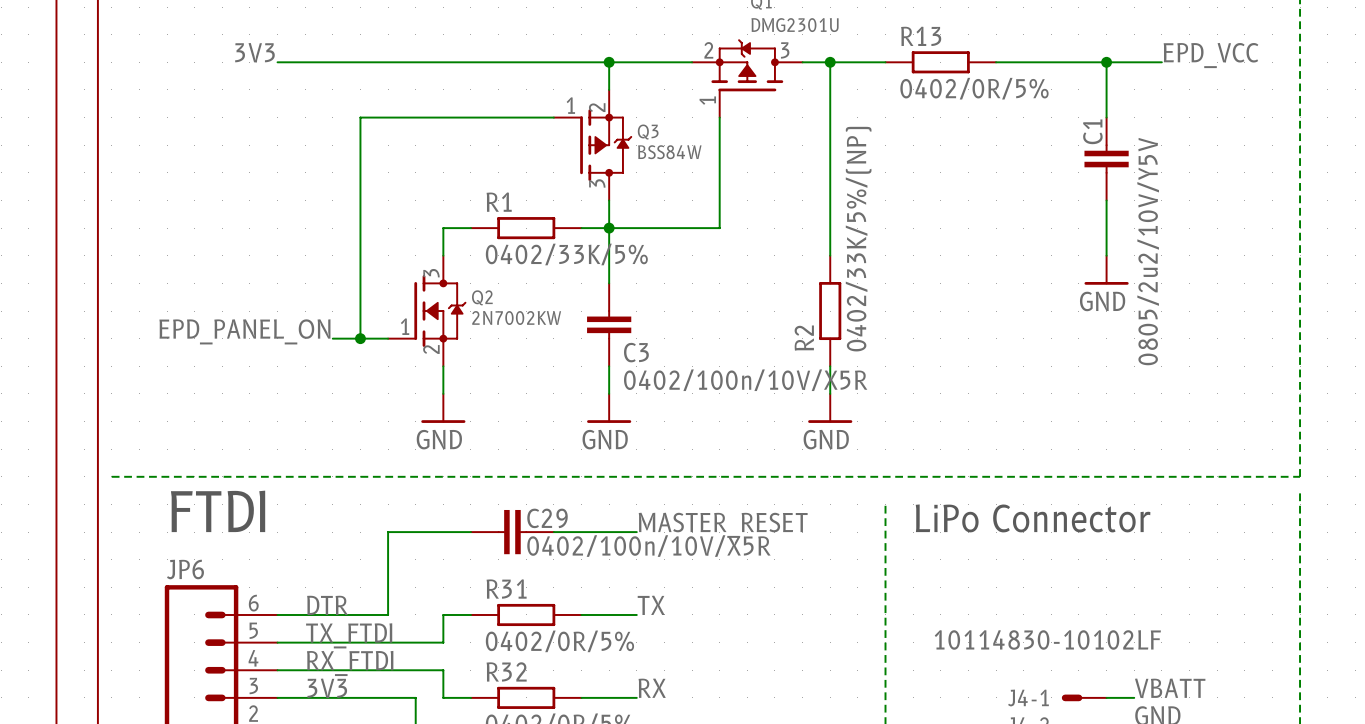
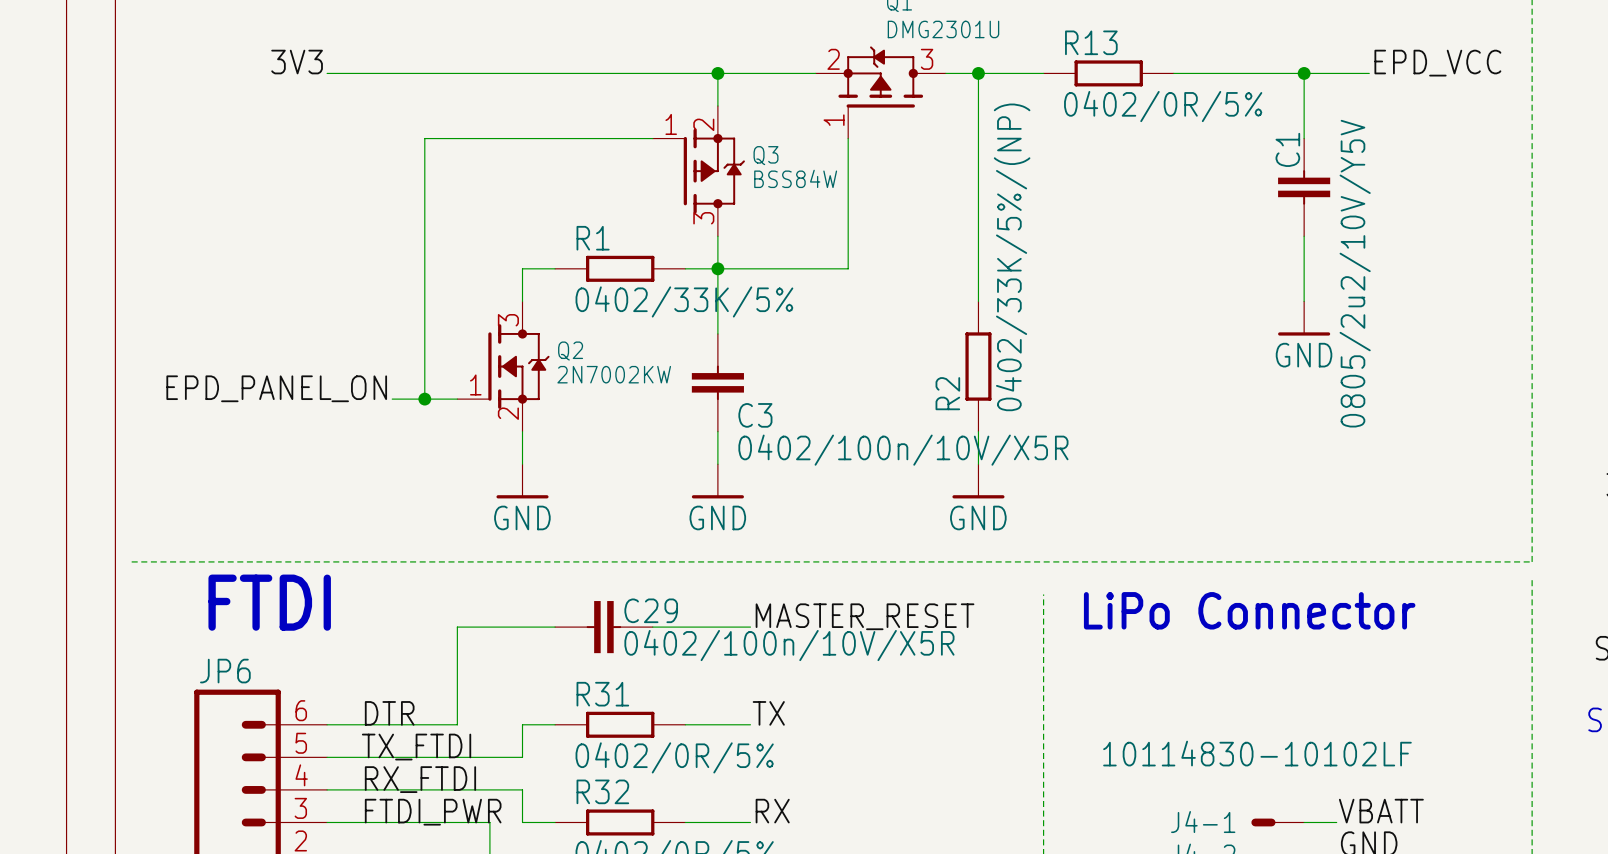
label: 3V3 (327, 688) -> FTDI_PWR (433, 812)

